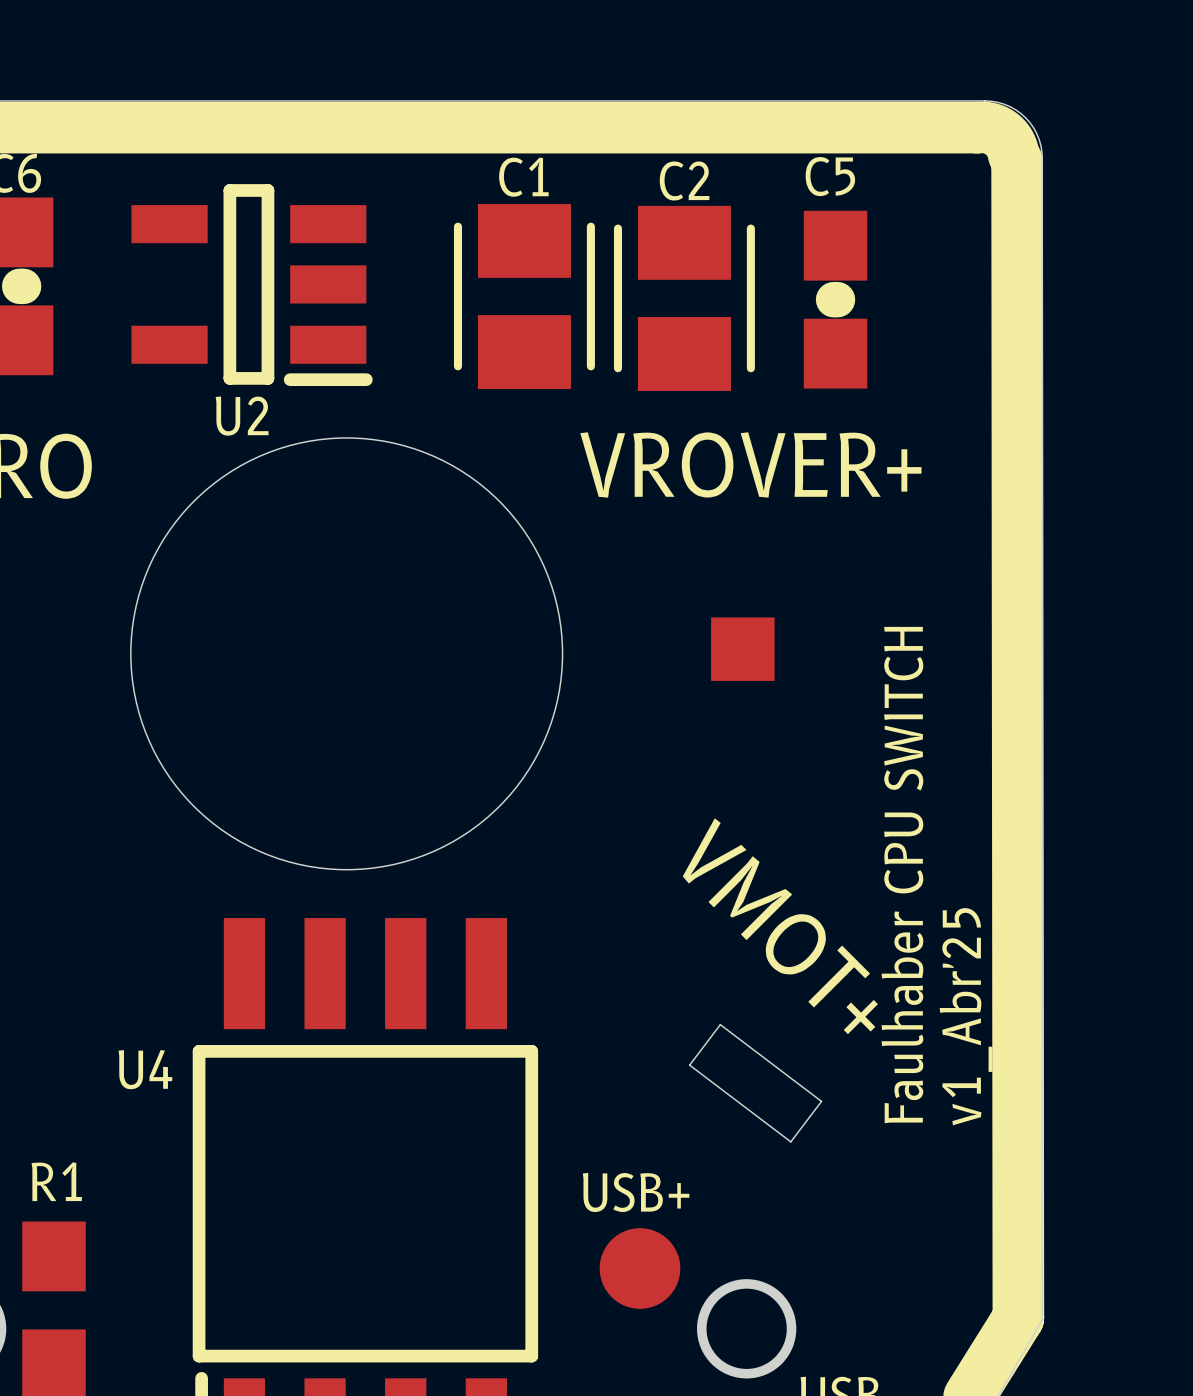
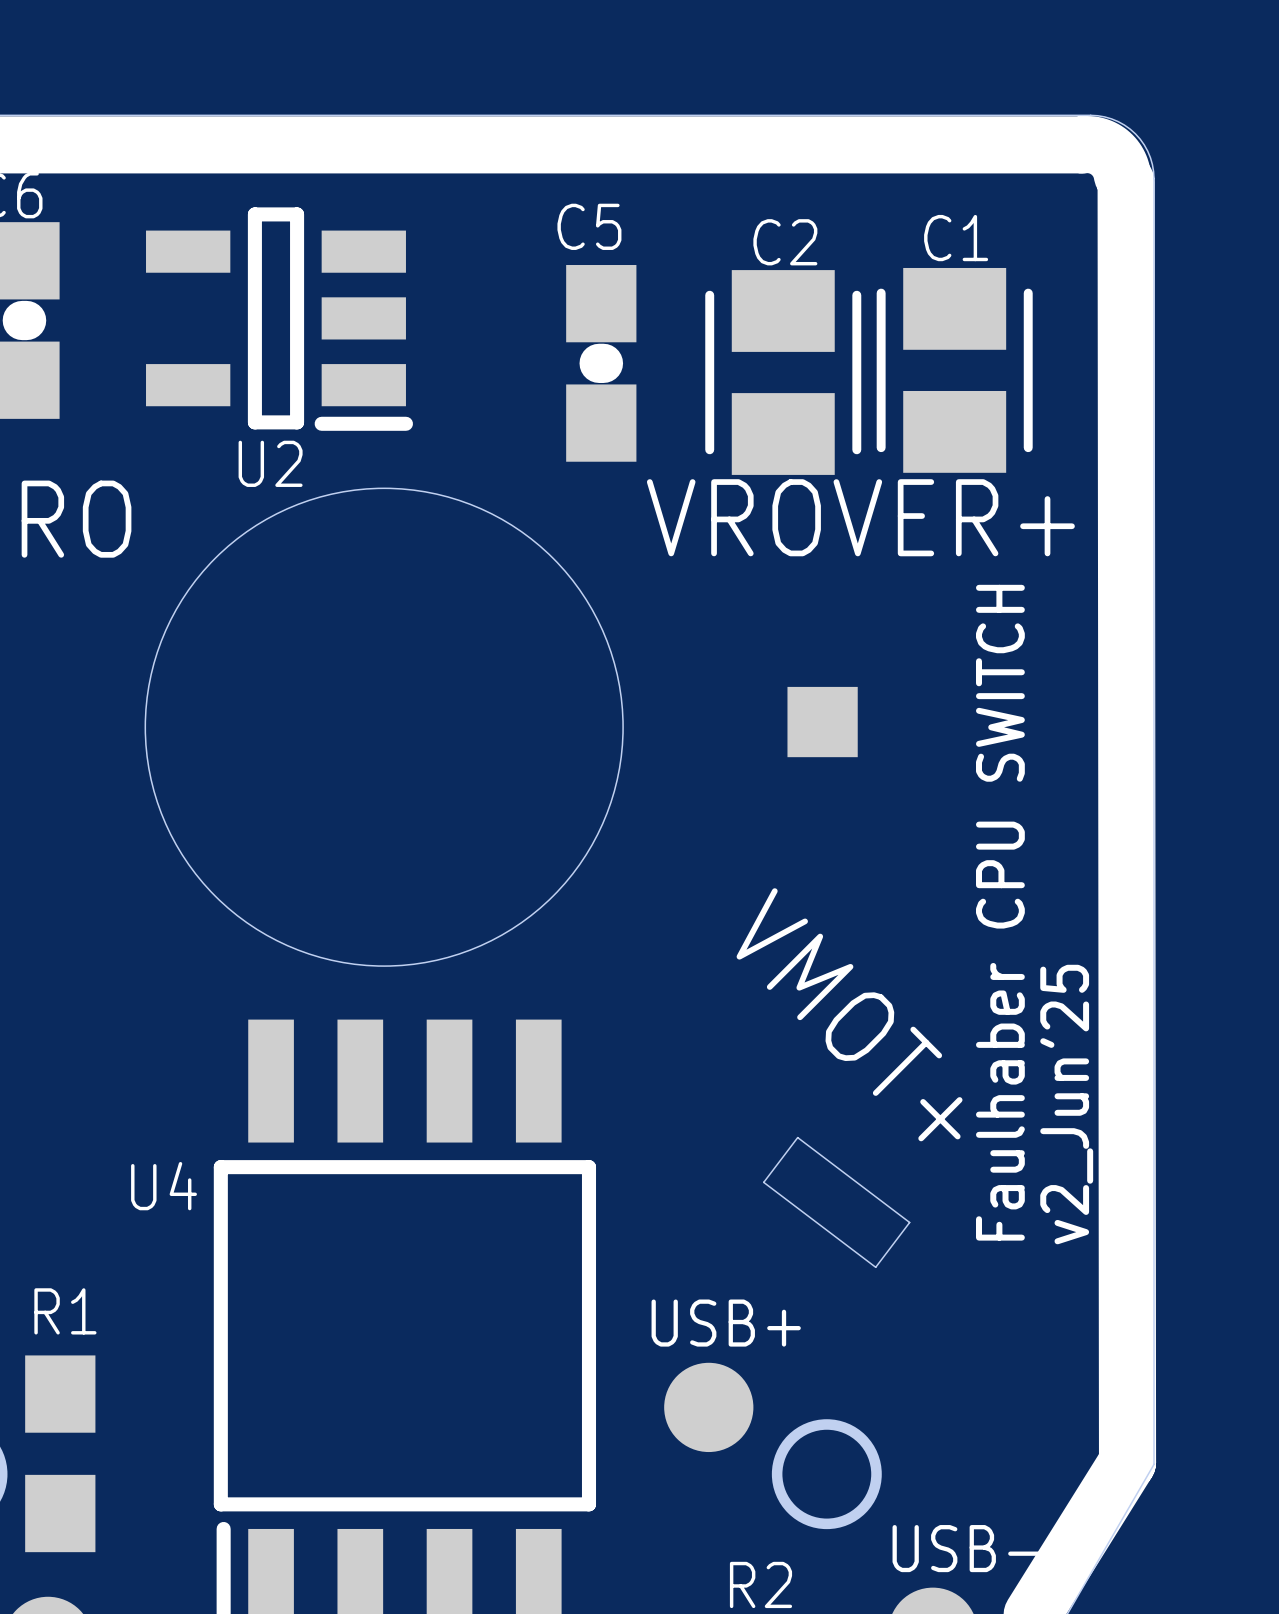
C1 position: (524, 296) -> (954, 370)
C2 position: (684, 298) -> (783, 372)
C5 position: (835, 299) -> (601, 363)
text: v1_Abr'25 (966, 1016) -> v2_Jun'25 (1066, 1104)

